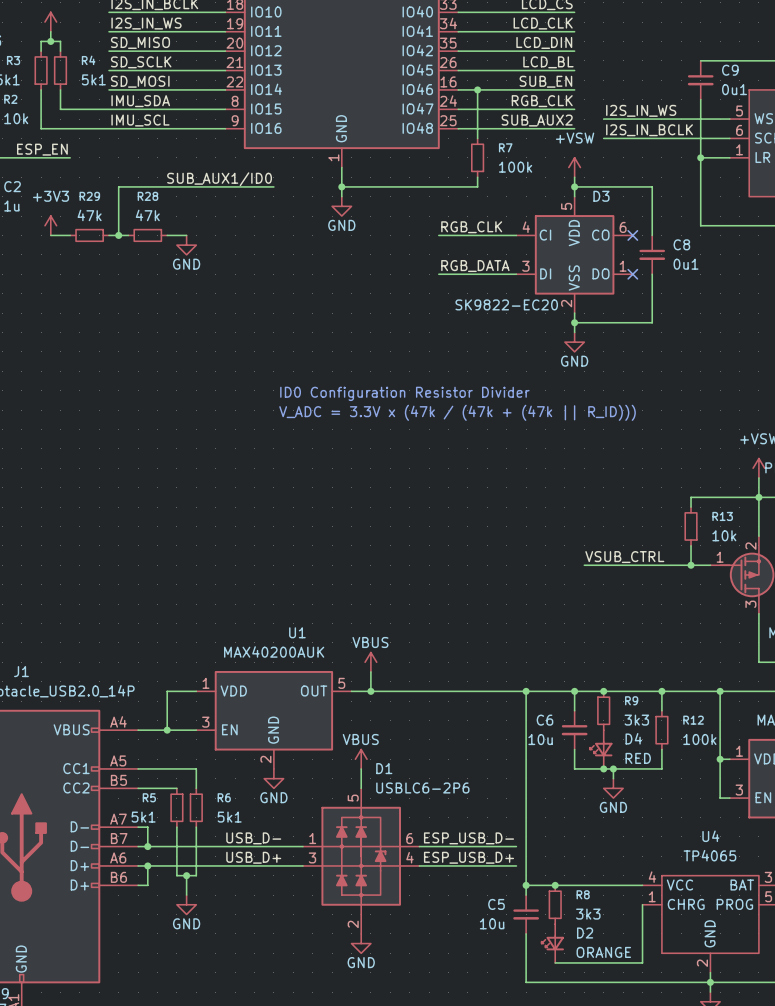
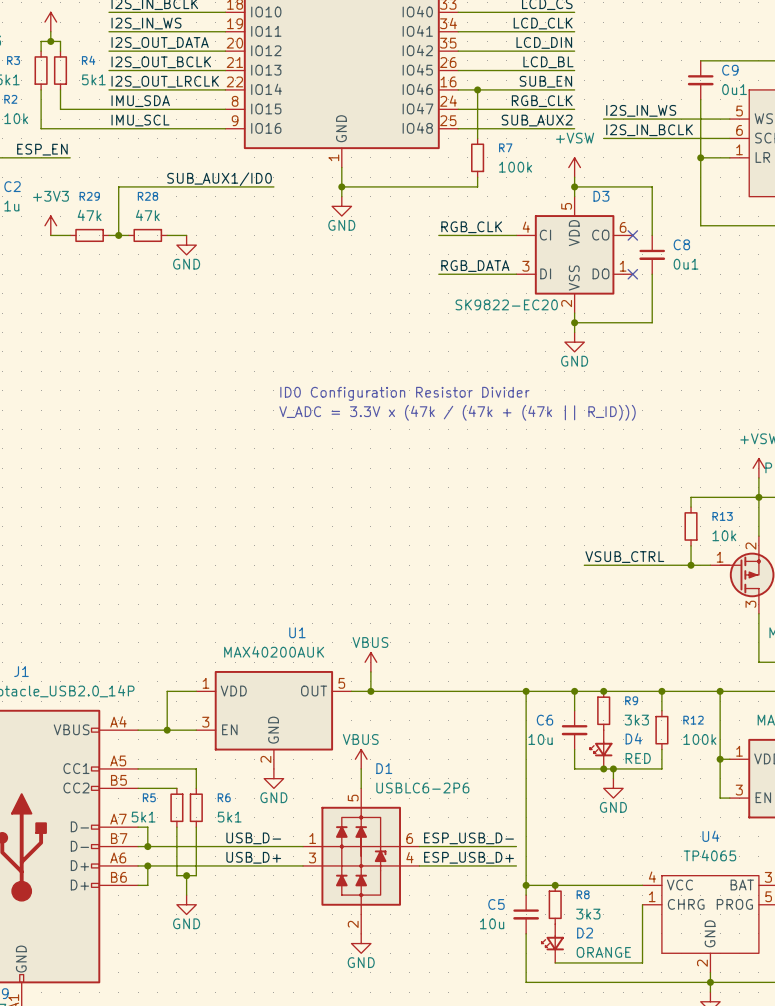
label: SD_MISO (140, 42) -> I2S_OUT_DATA (160, 42)
label: SD_SCLK (141, 62) -> I2S_OUT_BCLK (161, 62)
label: SD_MOSI (140, 81) -> I2S_OUT_LRCLK (165, 81)

